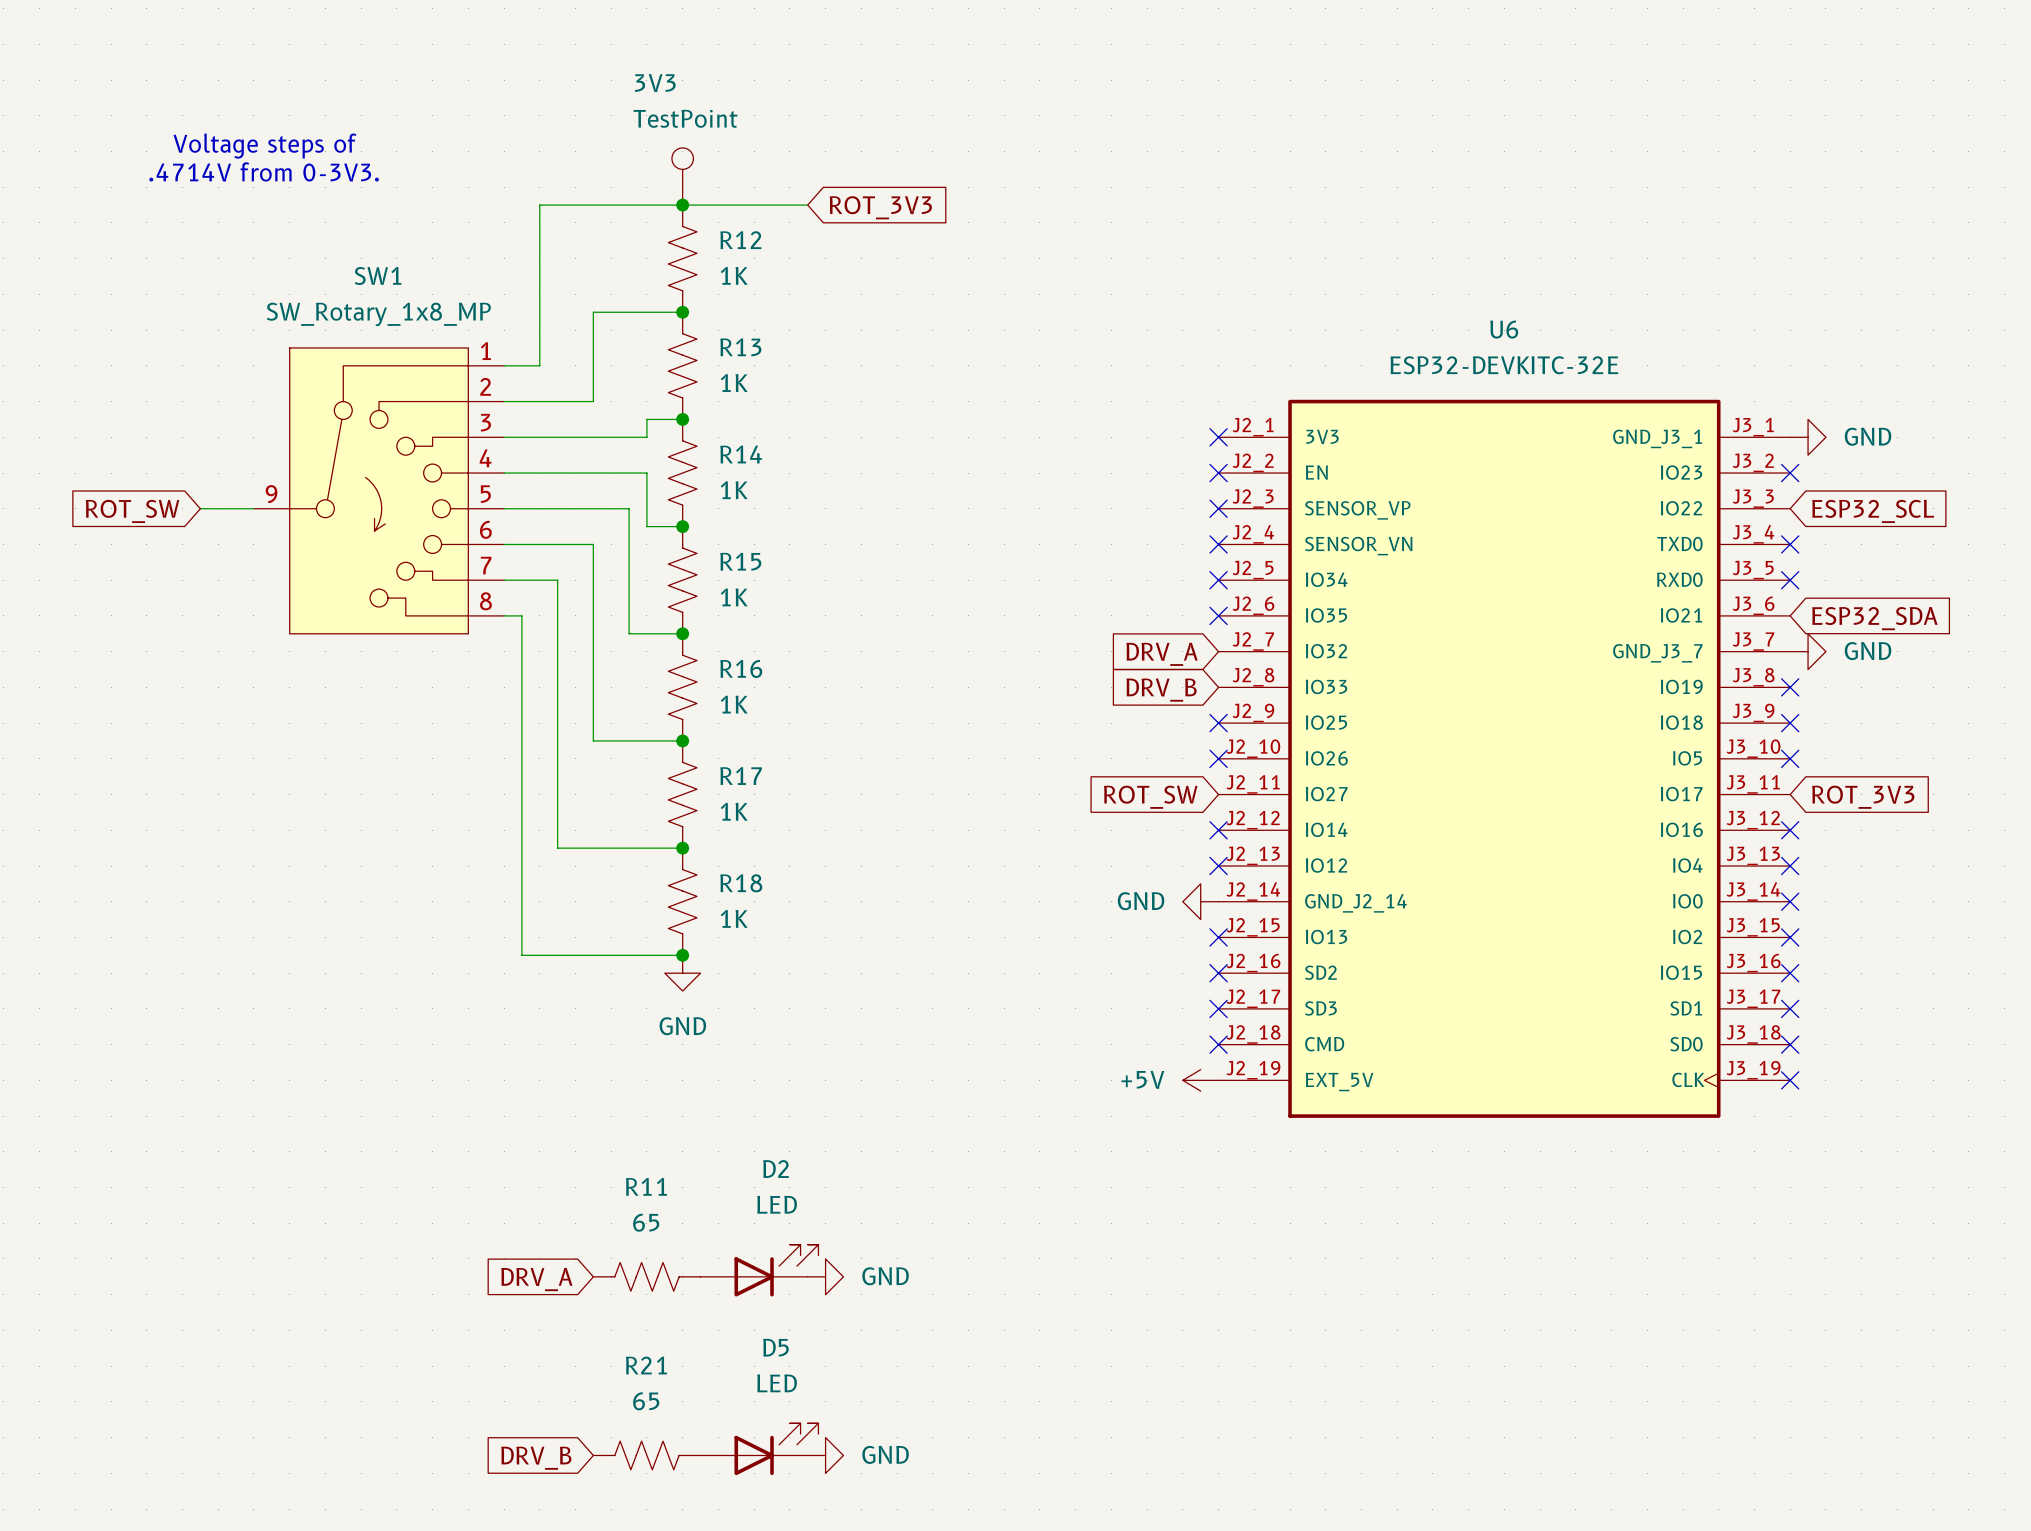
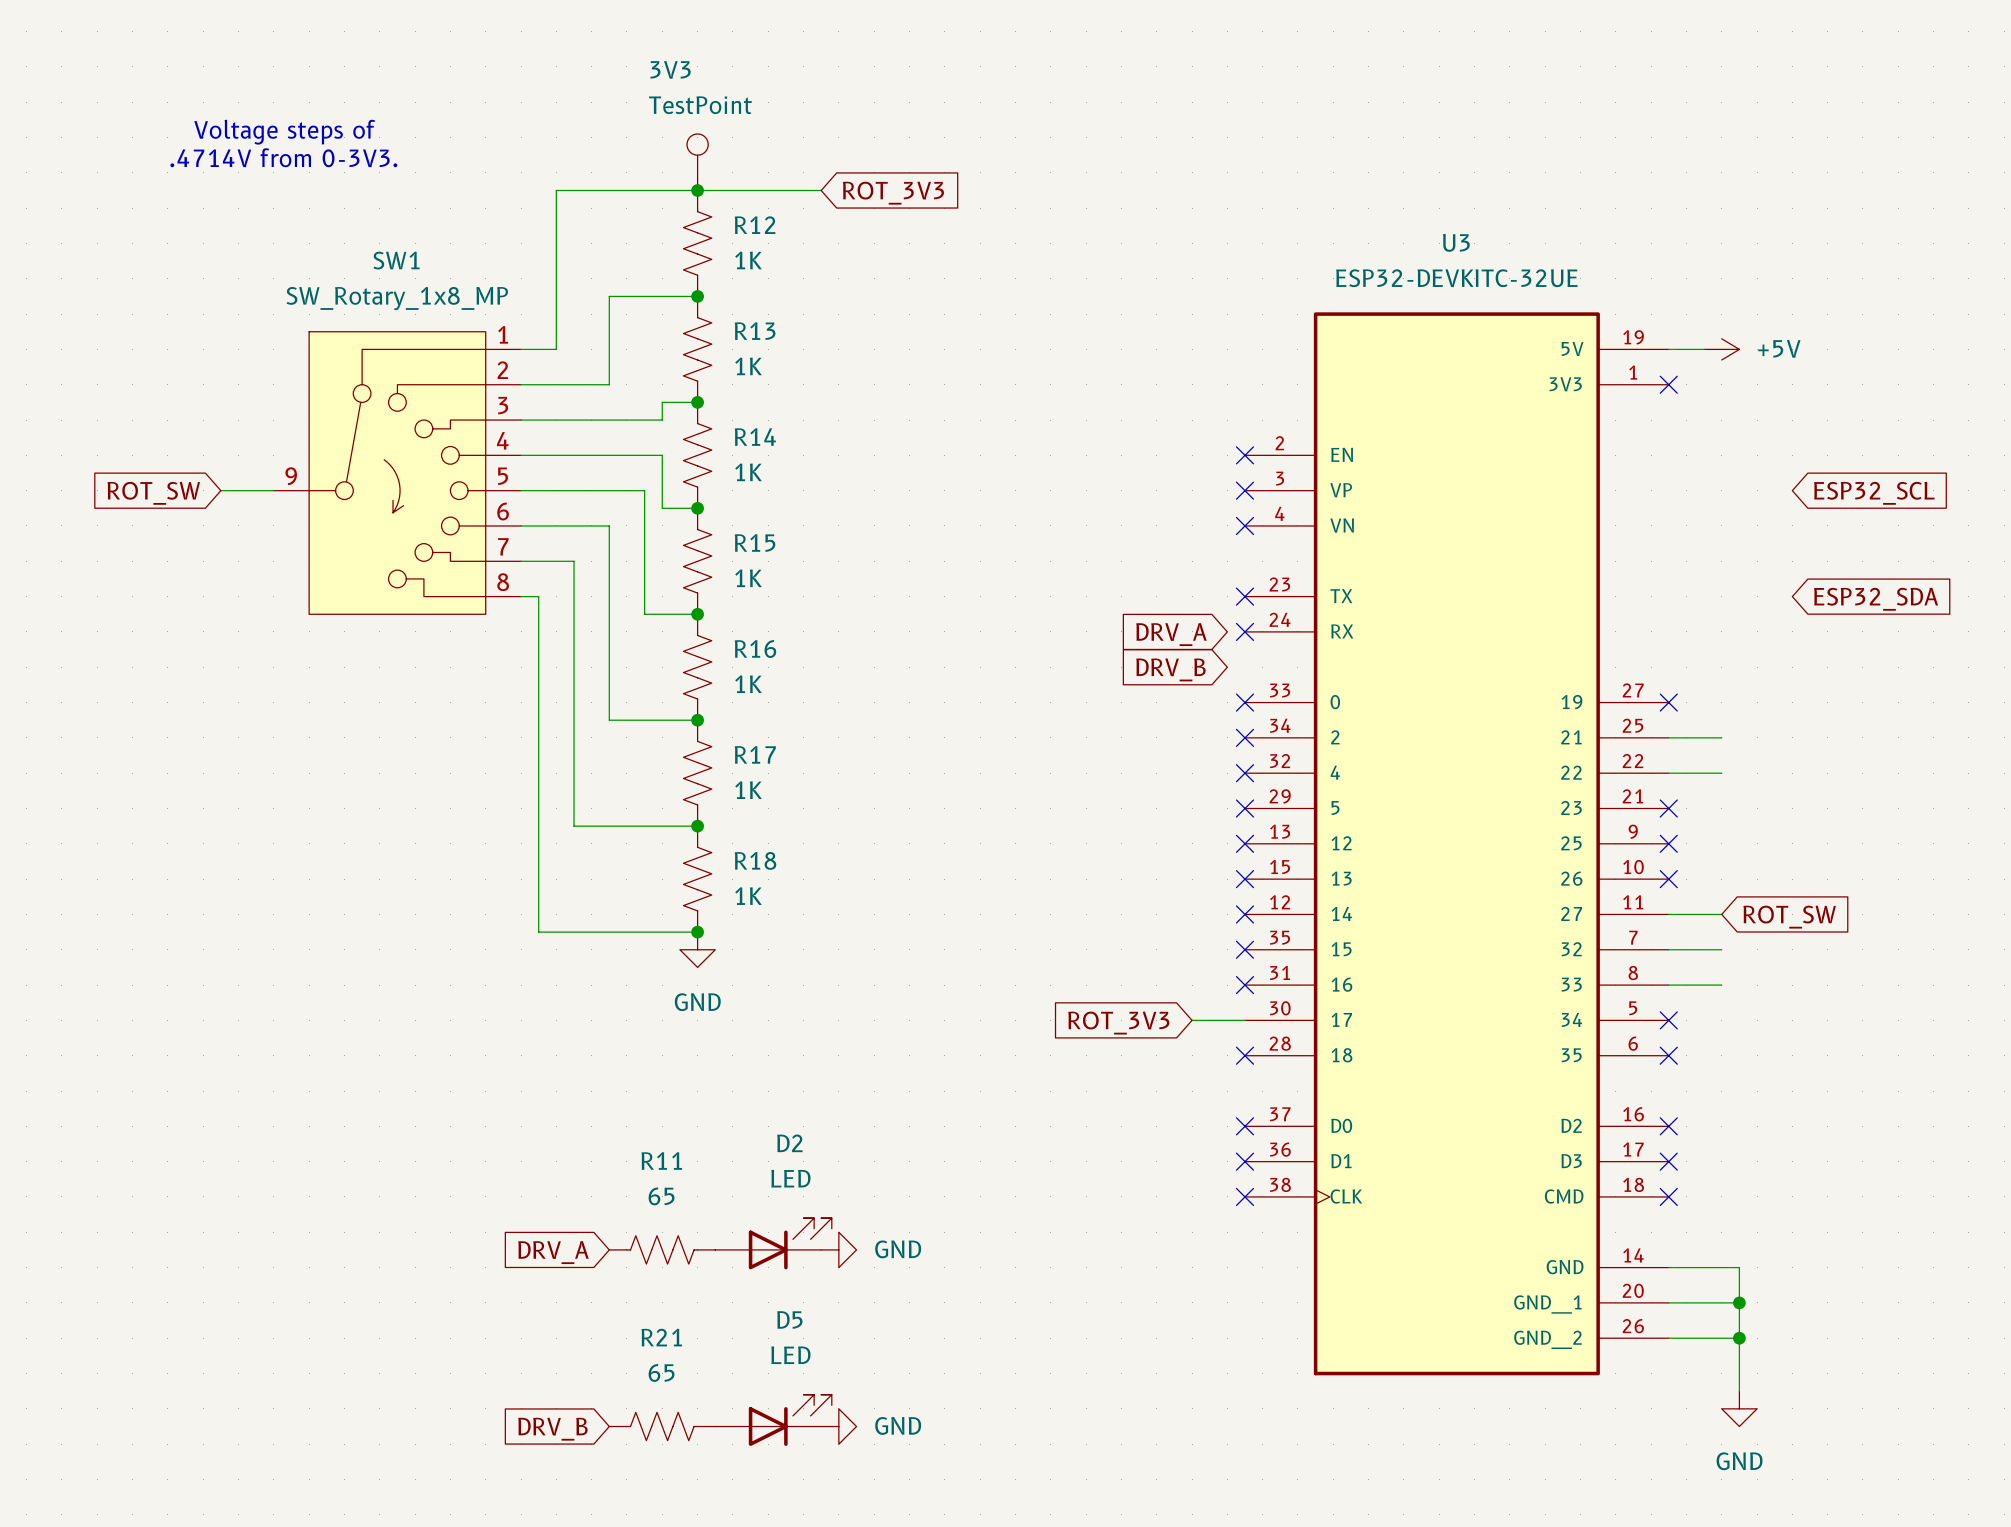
wire: none -> (1668, 349) (1704, 349)
power symbol: none -> +5V (1721, 349)
no-connect mark: none -> (1668, 384)
no-connect mark: (1218, 437) -> none
power symbol: GND (1808, 437) -> none
no-connect mark position: (1218, 473) -> (1244, 455)
no-connect mark: (1790, 473) -> none
no-connect mark position: (1218, 508) -> (1244, 490)
no-connect mark position: (1218, 544) -> (1244, 525)
no-connect mark: (1790, 544) -> none
no-connect mark: (1218, 580) -> none
no-connect mark: (1790, 580) -> none
no-connect mark position: (1218, 615) -> (1244, 596)
no-connect mark: none -> (1244, 631)
power symbol: GND (1808, 651) -> none
no-connect mark: (1790, 687) -> none
no-connect mark position: (1218, 723) -> (1244, 702)
no-connect mark: none -> (1668, 702)
no-connect mark: (1790, 723) -> none
no-connect mark position: (1218, 758) -> (1244, 737)
U6: ESP32-DEVKITC-32E (1504, 758) -> none
no-connect mark: (1790, 758) -> none
no-connect mark: none -> (1244, 773)
global label: ROT_SW (1150, 797) -> none
global label: ROT_3V3 (1863, 797) -> none
no-connect mark position: (1218, 830) -> (1244, 808)
no-connect mark: none -> (1668, 808)
no-connect mark: (1790, 830) -> none
no-connect mark position: (1218, 866) -> (1244, 843)
U3: none -> ESP32-DEVKITC-32UE (1456, 843)
no-connect mark: none -> (1668, 843)
no-connect mark: (1790, 866) -> none
power symbol: GND (1200, 901) -> none
no-connect mark: none -> (1244, 879)
no-connect mark: none -> (1668, 879)
no-connect mark: (1790, 901) -> none
no-connect mark position: (1218, 937) -> (1244, 914)
no-connect mark: (1790, 937) -> none
global label: none -> ROT_SW (1789, 917)
no-connect mark position: (1218, 973) -> (1244, 949)
no-connect mark: (1790, 973) -> none
no-connect mark position: (1218, 1008) -> (1244, 985)
no-connect mark: (1790, 1008) -> none
wire: none -> (1192, 1020) (1244, 1020)
no-connect mark: (1218, 1044) -> none
no-connect mark: none -> (1668, 1020)
no-connect mark: (1790, 1044) -> none
global label: none -> ROT_3V3 (1118, 1023)
power symbol: +5V (1200, 1080) -> none
no-connect mark: none -> (1244, 1055)
no-connect mark: none -> (1668, 1055)
no-connect mark: (1790, 1080) -> none
no-connect mark: none -> (1244, 1126)
no-connect mark: none -> (1668, 1126)
no-connect mark: none -> (1244, 1161)
no-connect mark: none -> (1668, 1161)
no-connect mark: none -> (1244, 1196)
no-connect mark: none -> (1668, 1196)
wire: none -> (1668, 1267) (1739, 1267) (1739, 1391)
wire: none -> (1668, 1302) (1739, 1302)
junction: none -> (1739, 1302)
wire: none -> (1668, 1338) (1739, 1338)
junction: none -> (1739, 1338)
power symbol: none -> GND (1739, 1408)

